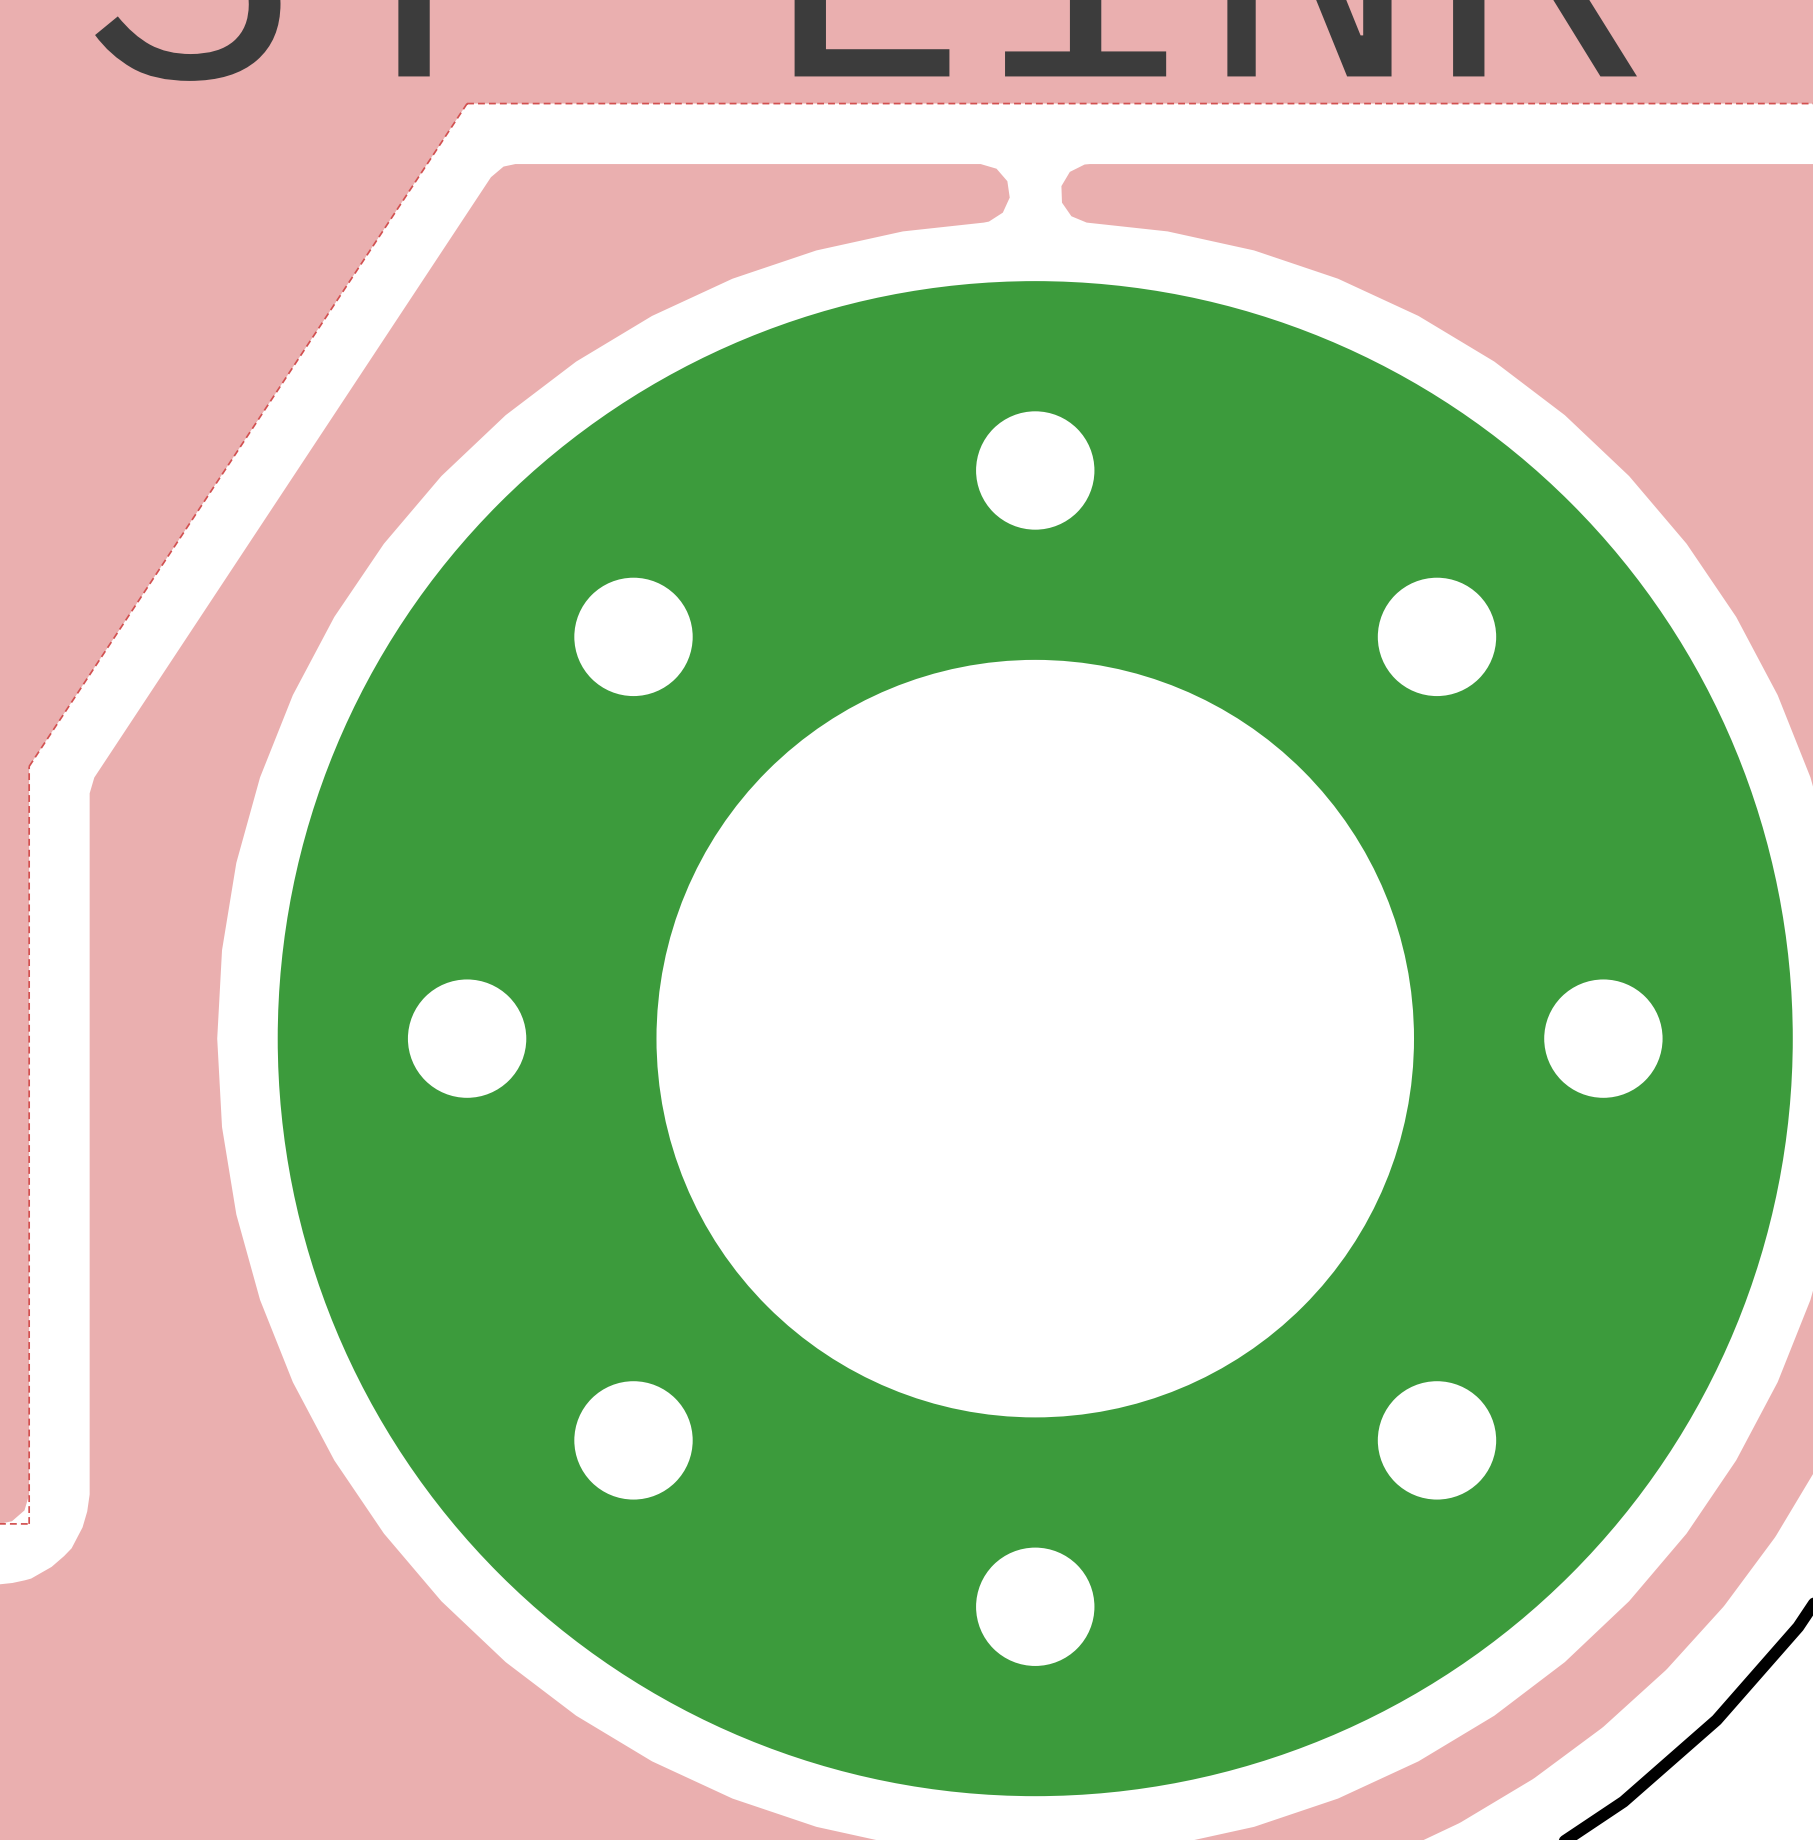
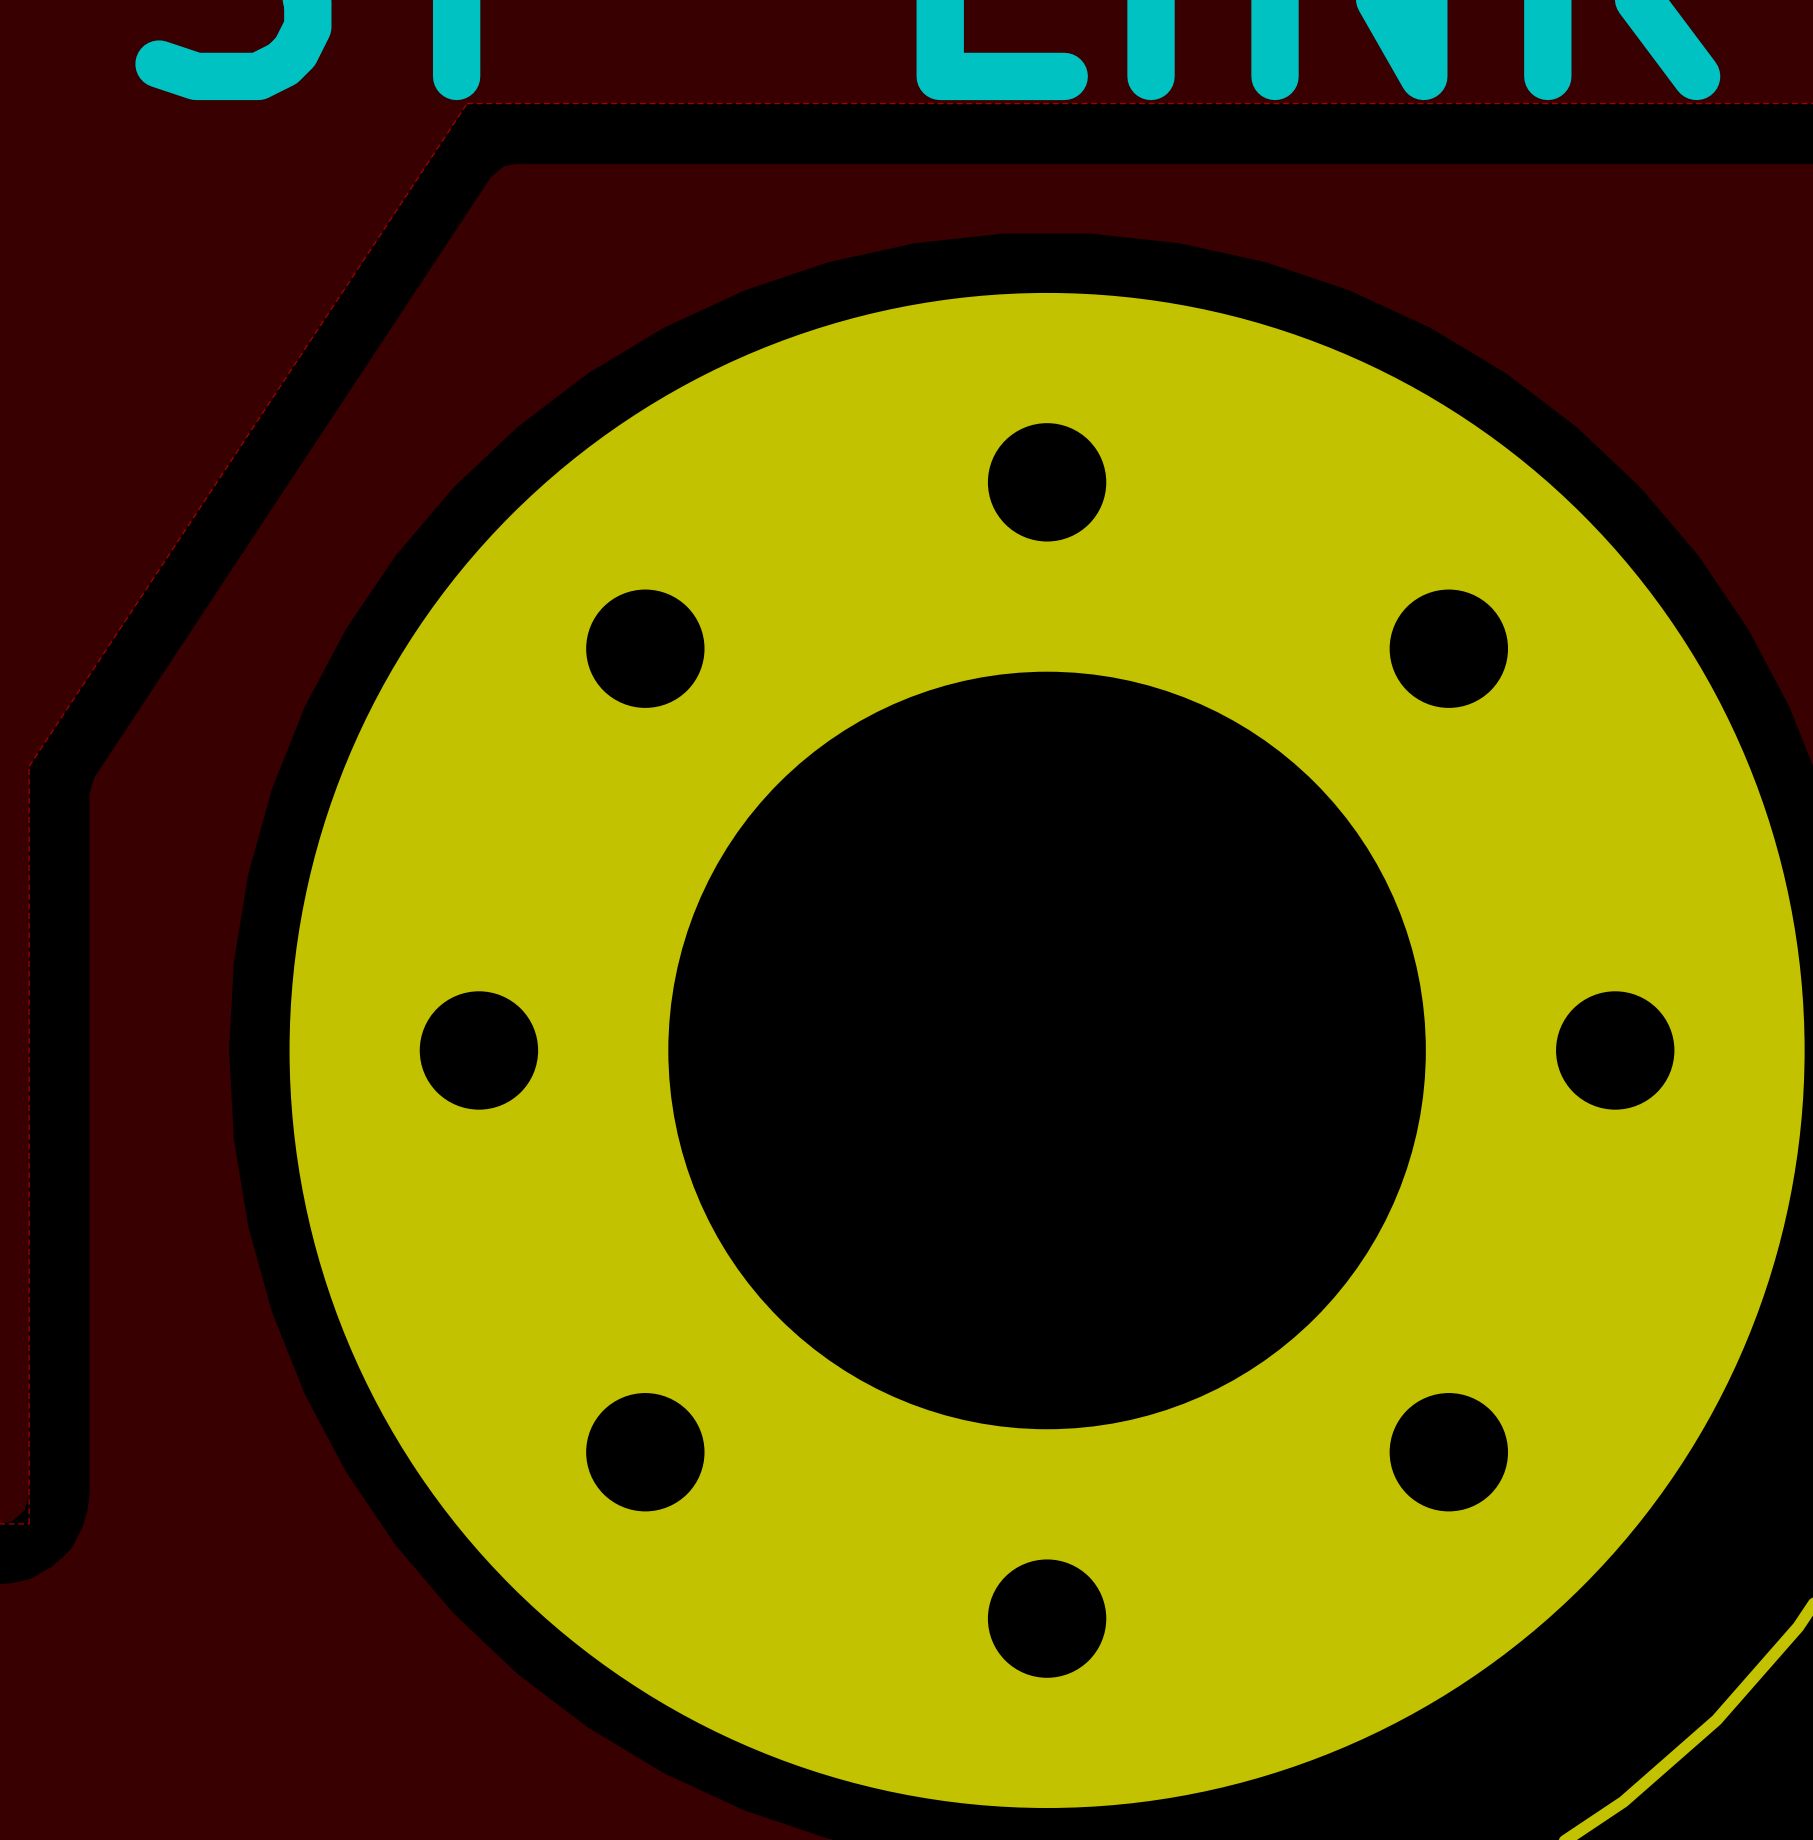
part position: (1035, 1038) -> (1047, 1050)

